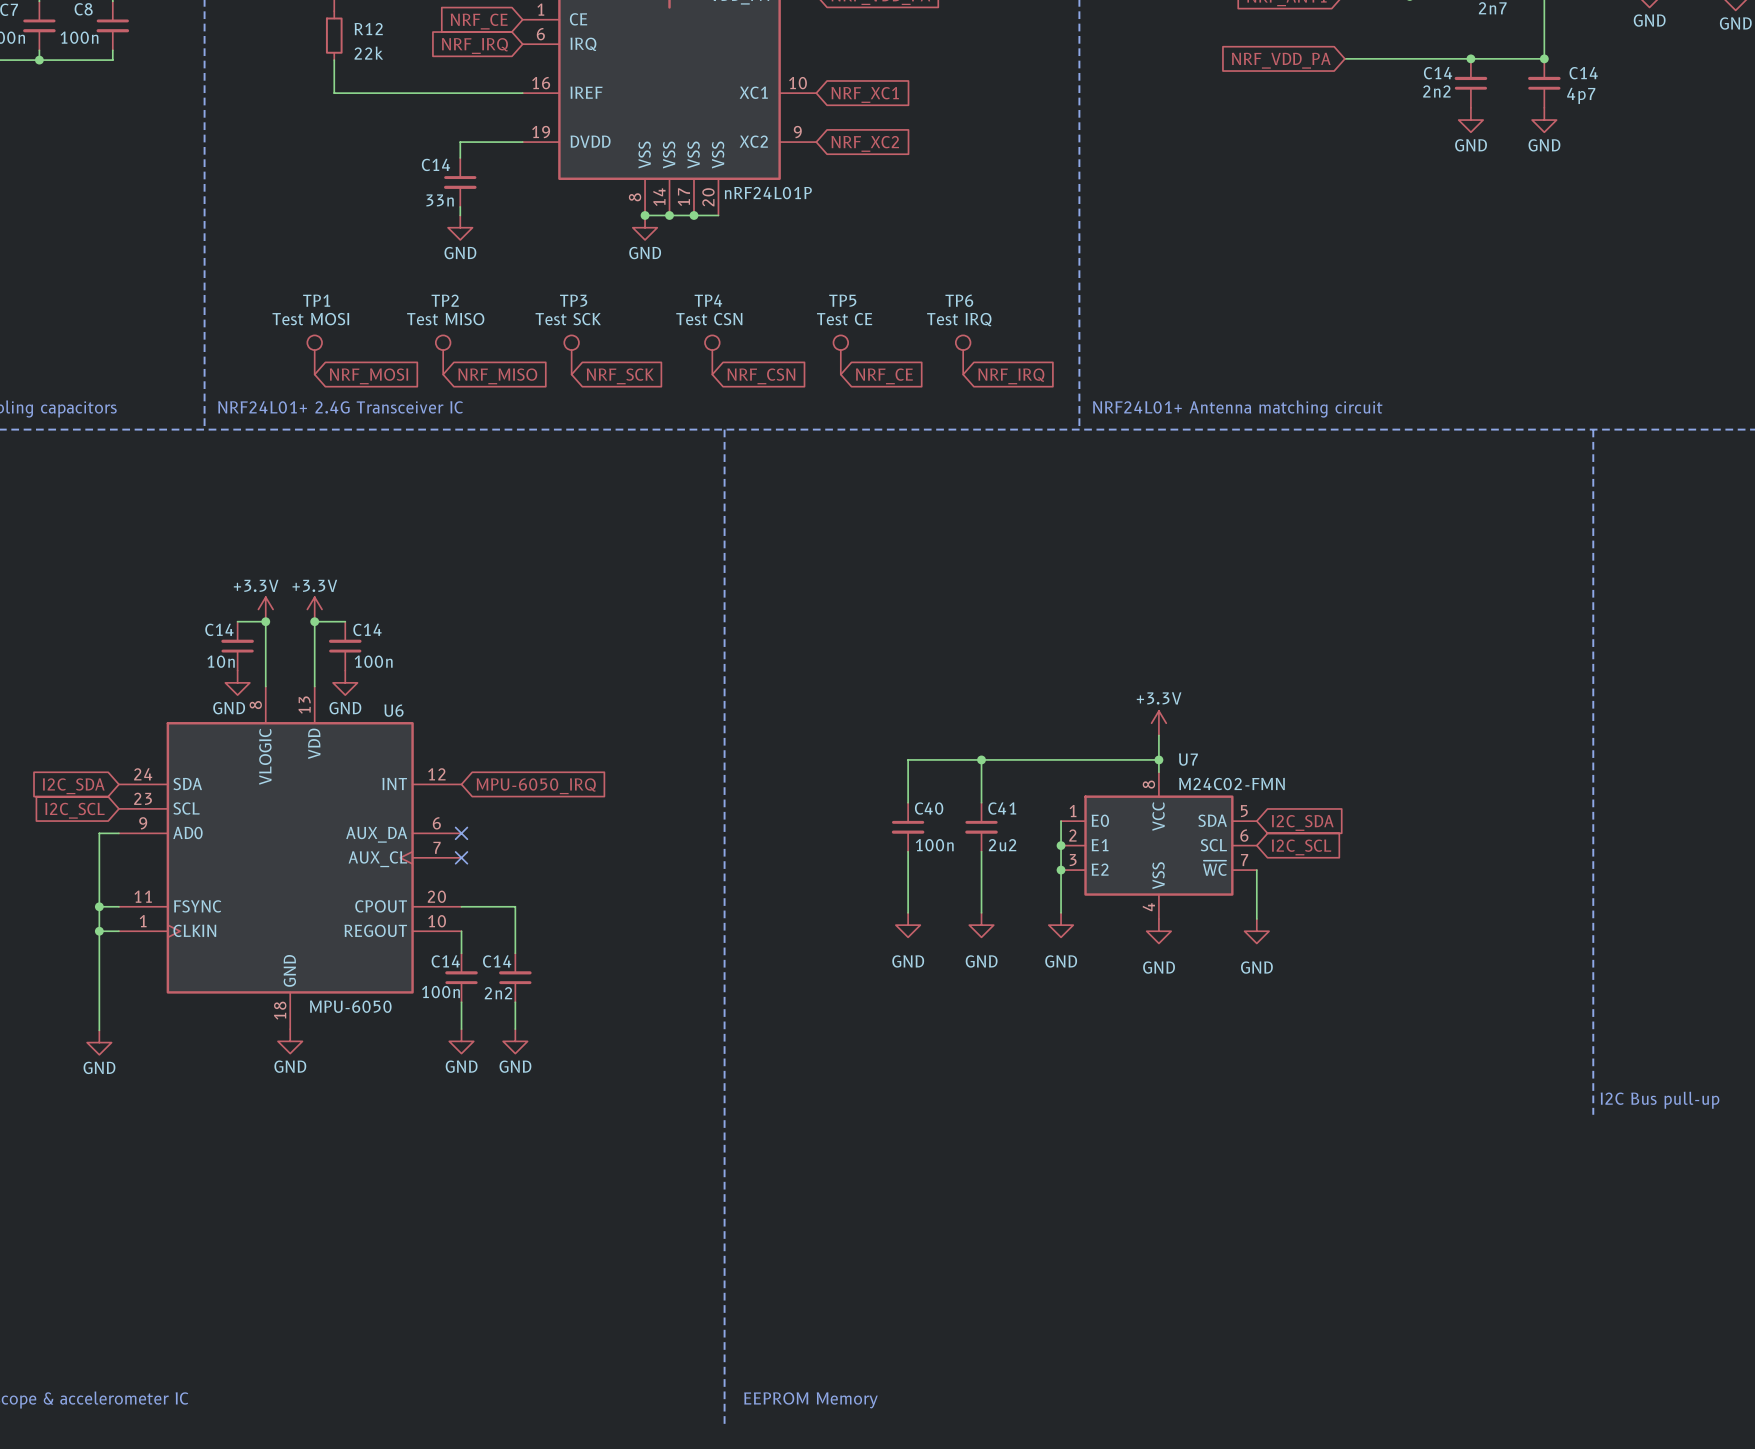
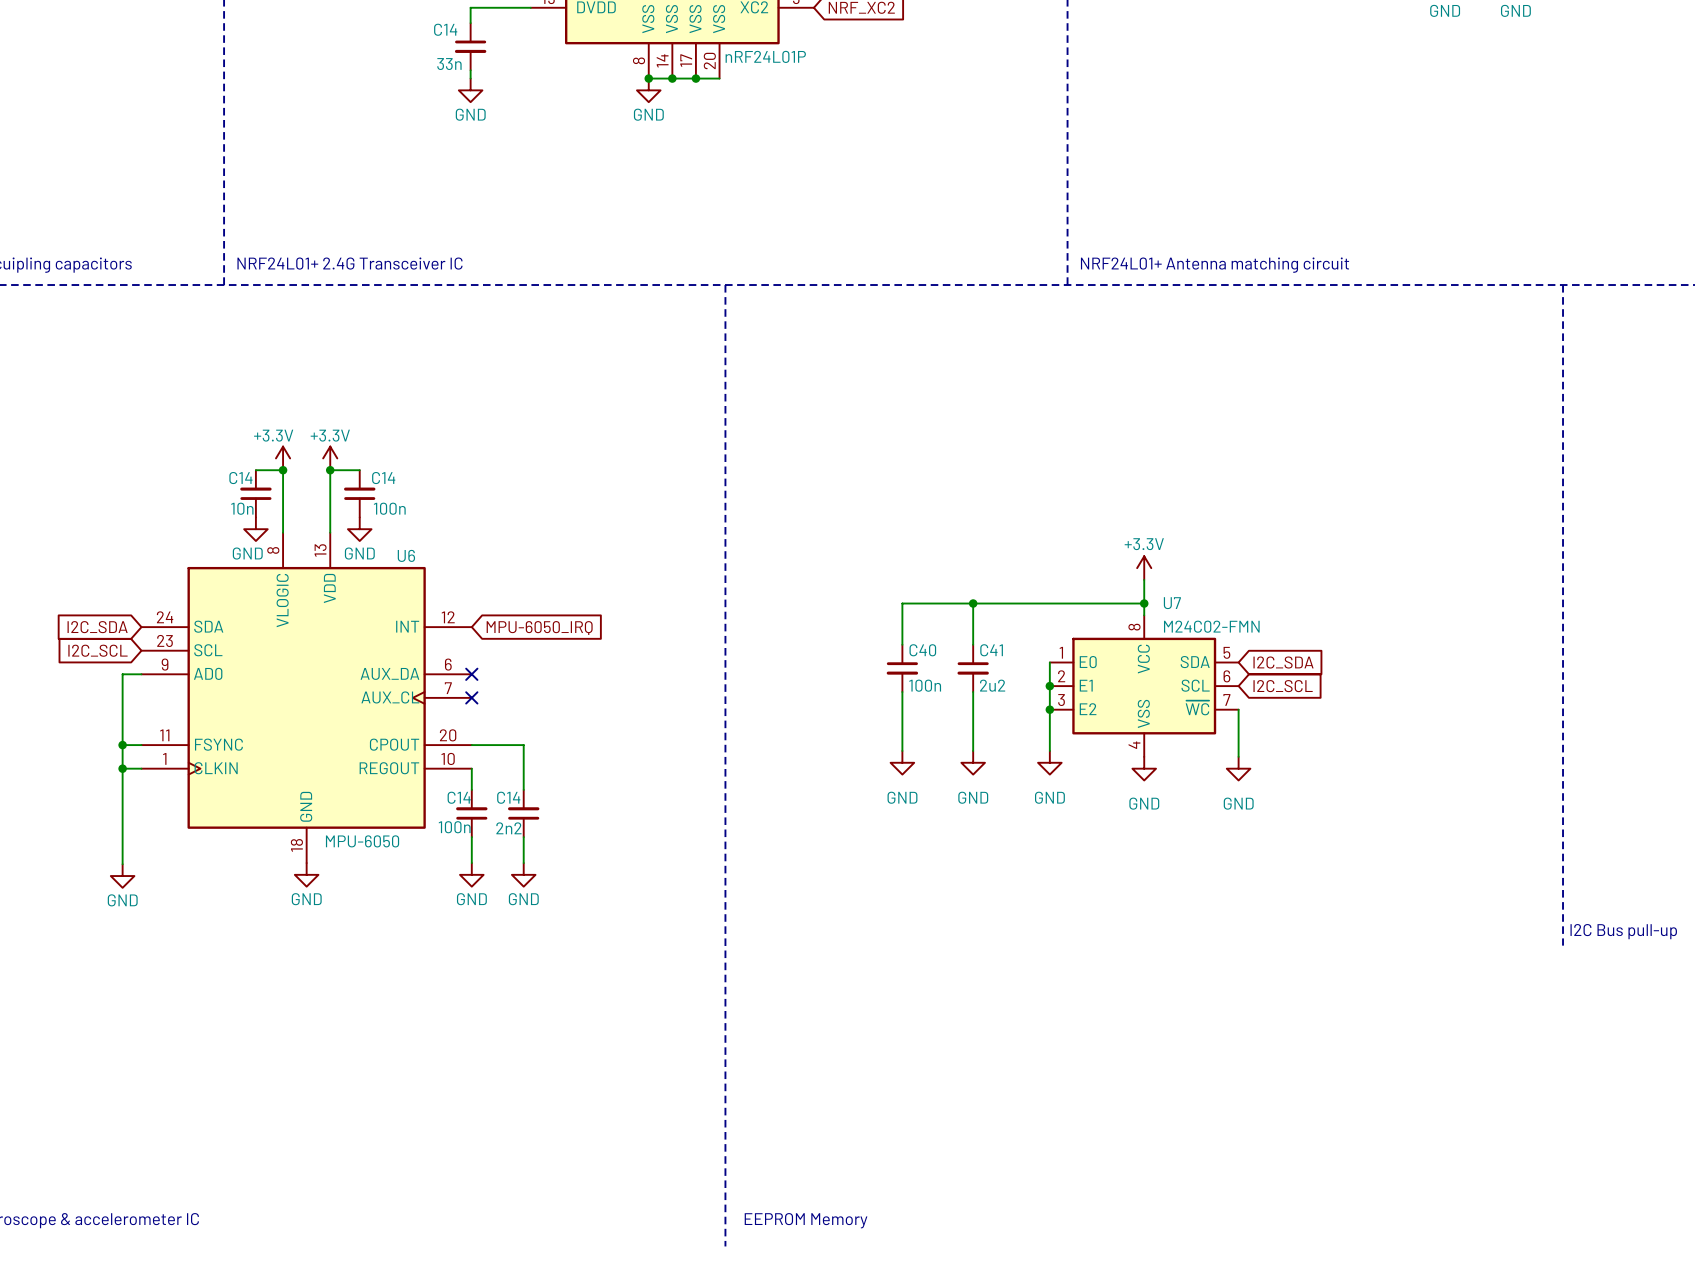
TP1: Test MOSI (314, 354) -> none
TP2: Test MISO (443, 354) -> none
TP3: Test SCK (571, 354) -> none
TP4: Test CSN (712, 354) -> none
TP5: Test CE (840, 354) -> none
TP6: Test IRQ (963, 354) -> none
global label: NRF_MOSI (368, 376) -> none
global label: NRF_MISO (497, 376) -> none
global label: NRF_SCK (620, 376) -> none
global label: NRF_CSN (761, 376) -> none
global label: NRF_CE (884, 376) -> none
global label: NRF_IRQ (1011, 376) -> none

